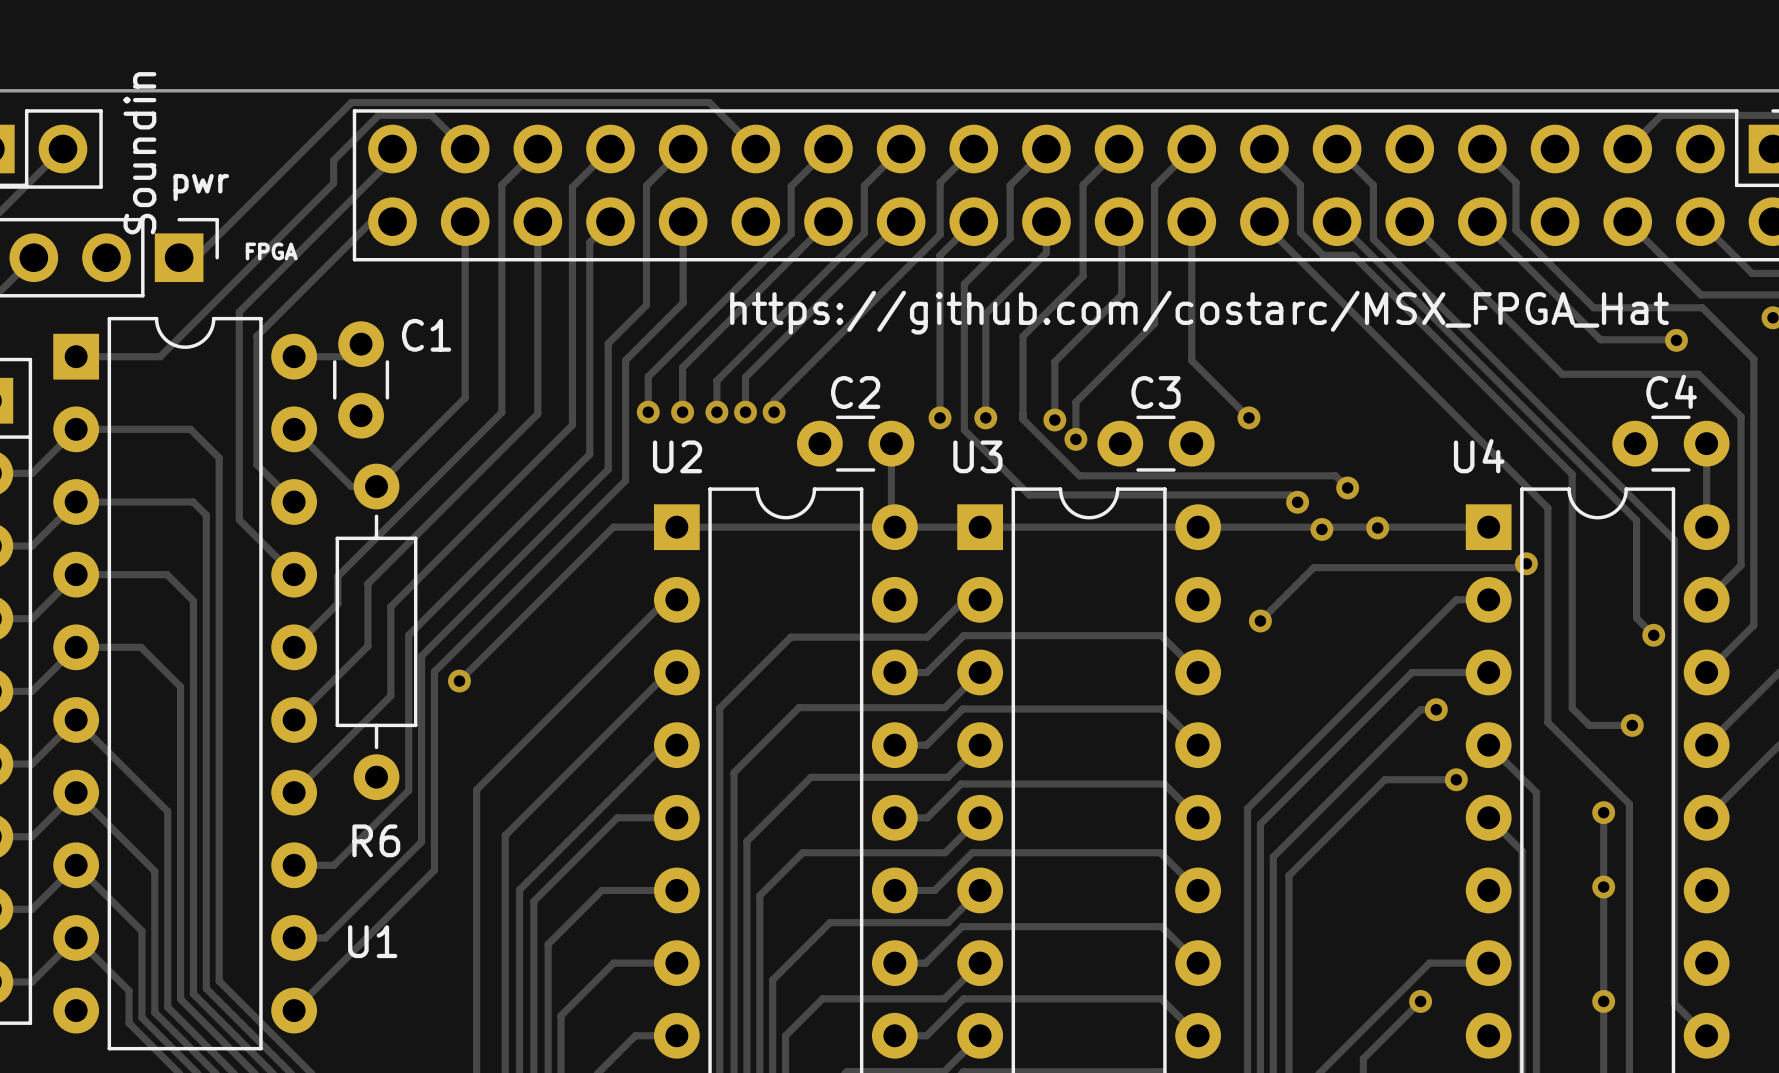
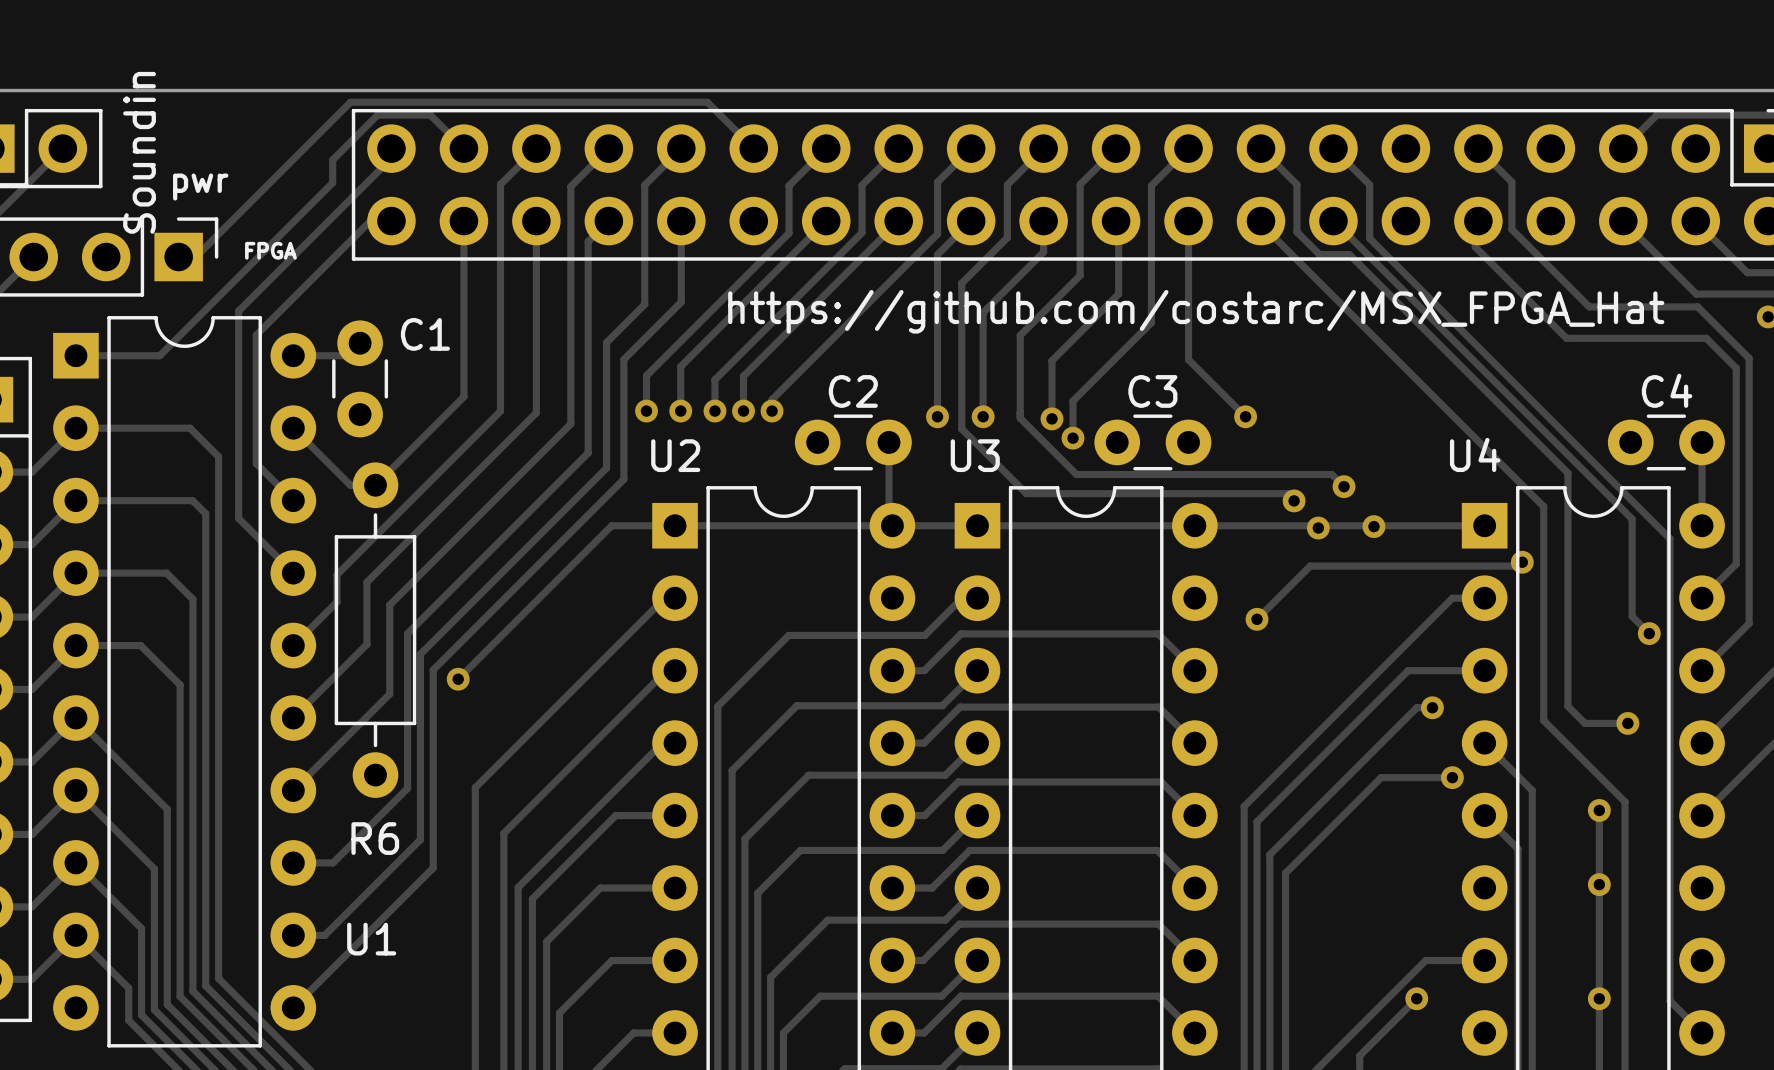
track: (1409, 221) (1562, 374) (1698, 374) (1740, 416) -> (1475, 224) (1475, 247) (1566, 338) (1706, 338) (1736, 368) (1736, 415)
track: (1482, 221) (1600, 339) (1676, 340) (1673, 339) -> none
via: (1676, 340) -> none

